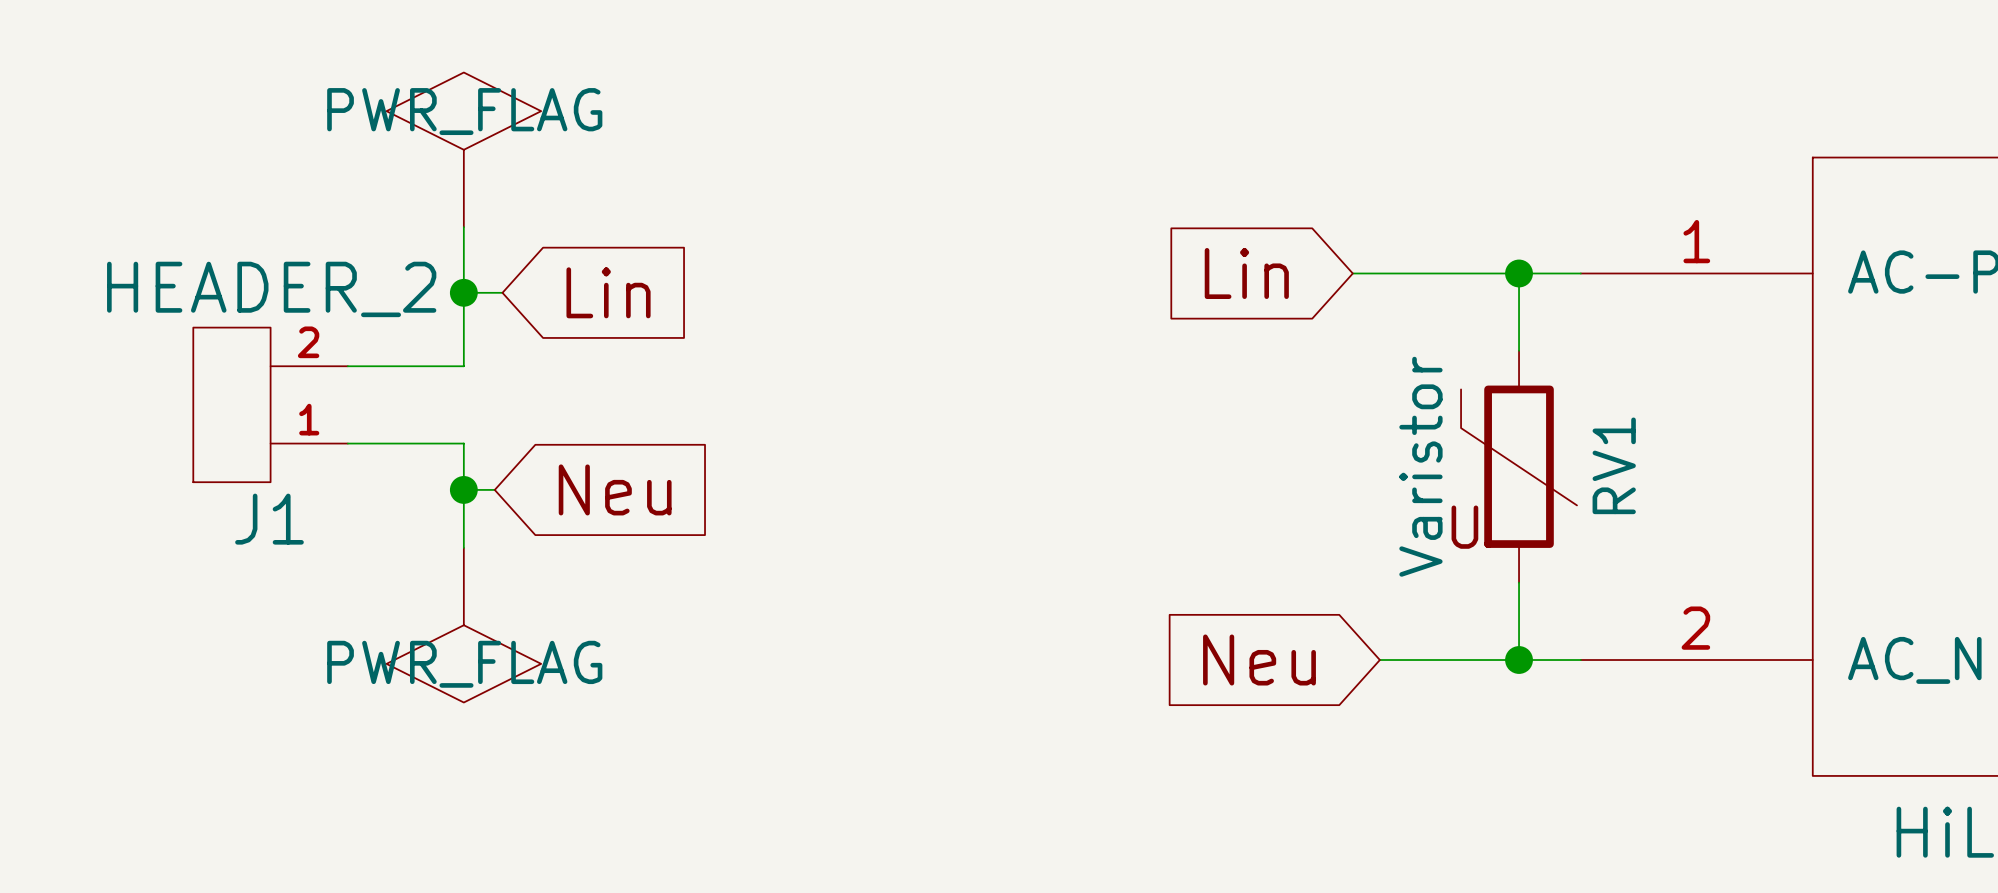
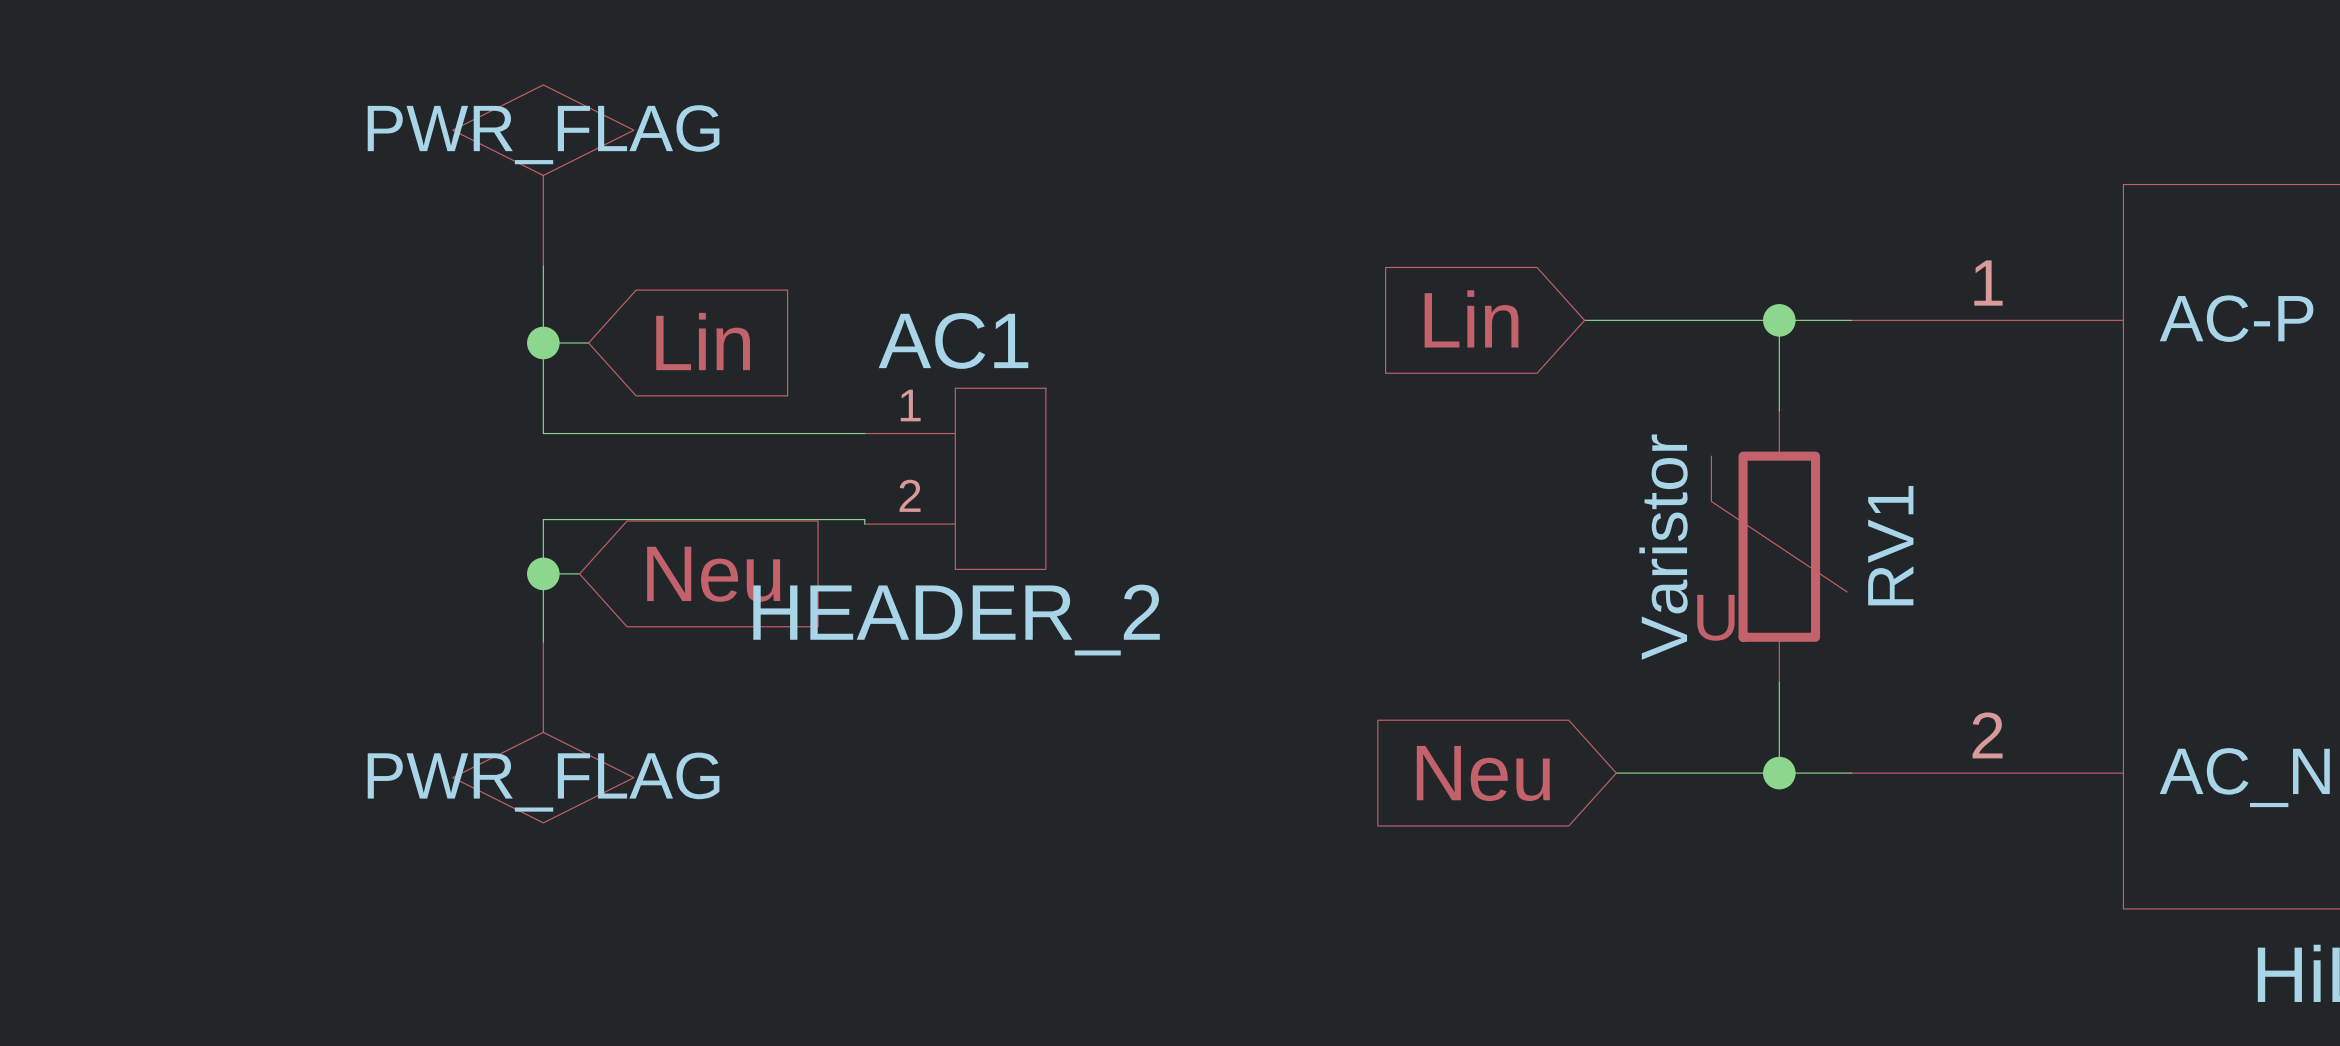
wire: (347, 366) (463, 366) -> (864, 433) (543, 433) (543, 429)
J1: HEADER_2 (270, 404) -> none
AC1: none -> HEADER_2 (955, 478)
wire: (347, 443) (463, 443) -> (864, 524) (864, 519) (543, 519)

